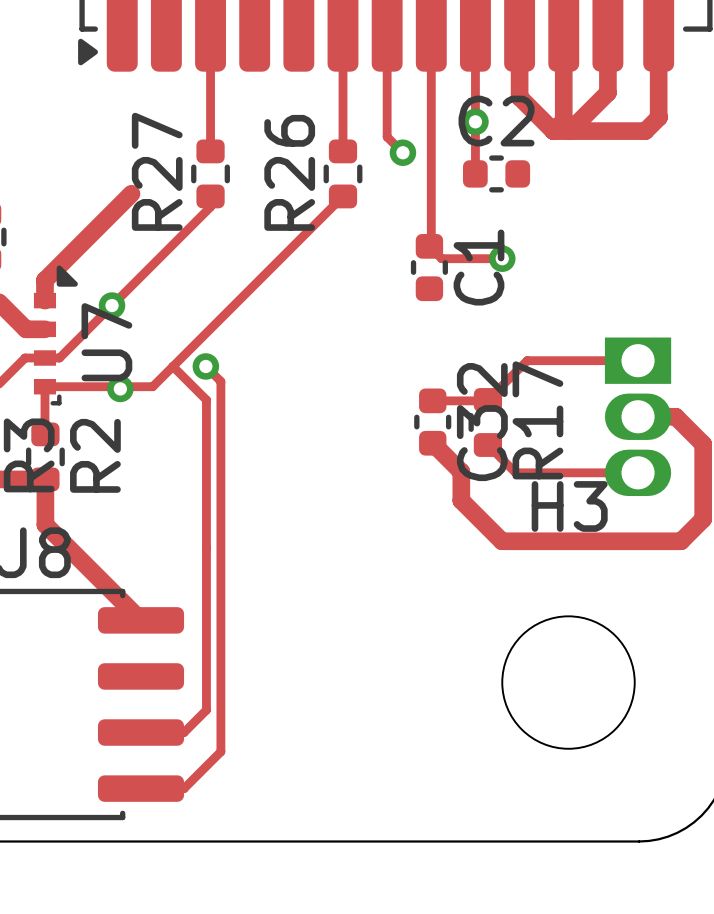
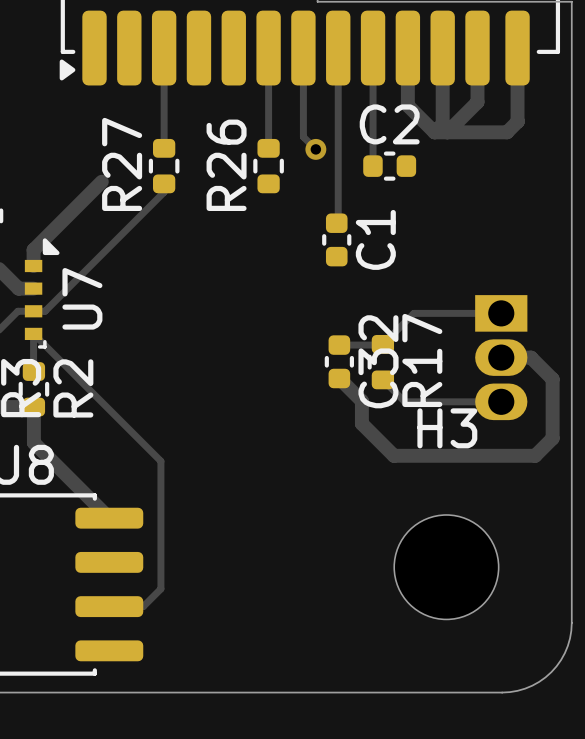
via: (475, 121) -> none
track: (343, 196) (172, 366) -> none
track: (429, 246) (441, 258) (502, 258) -> none
via: (502, 258) -> none
via: (112, 305) -> none
track: (172, 366) (206, 399) (206, 548) -> (33, 333) (160, 461)
track: (172, 366) (152, 386) (44, 386) -> none
track: (205, 366) (220, 381) (220, 751) (184, 788) (141, 788) -> none
via: (205, 366) -> none
via: (120, 388) -> none

